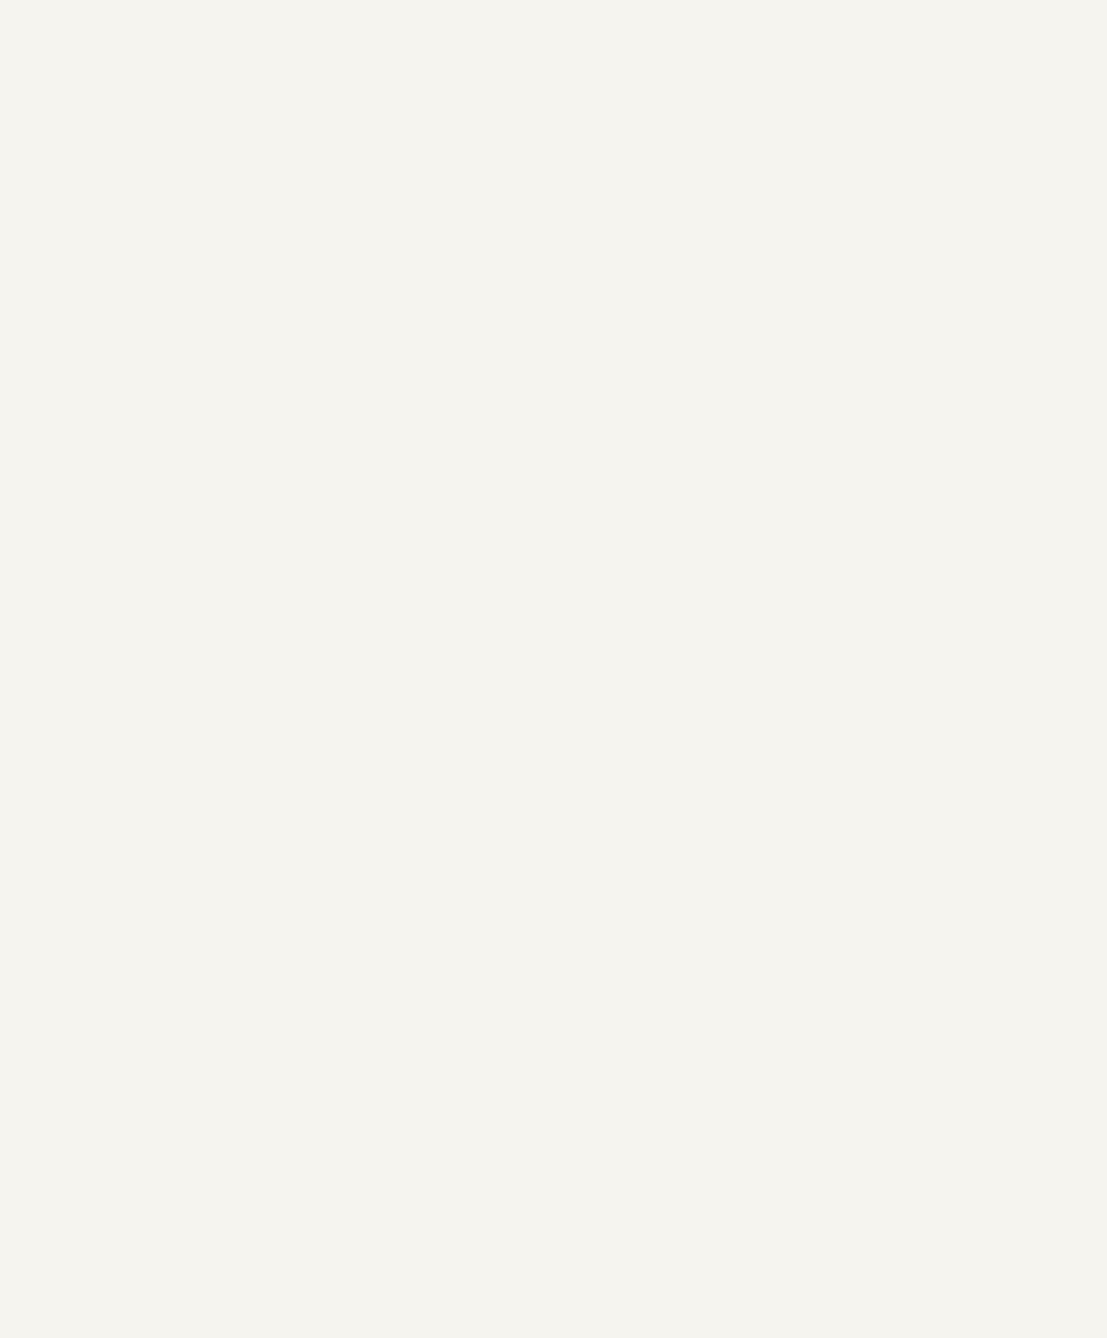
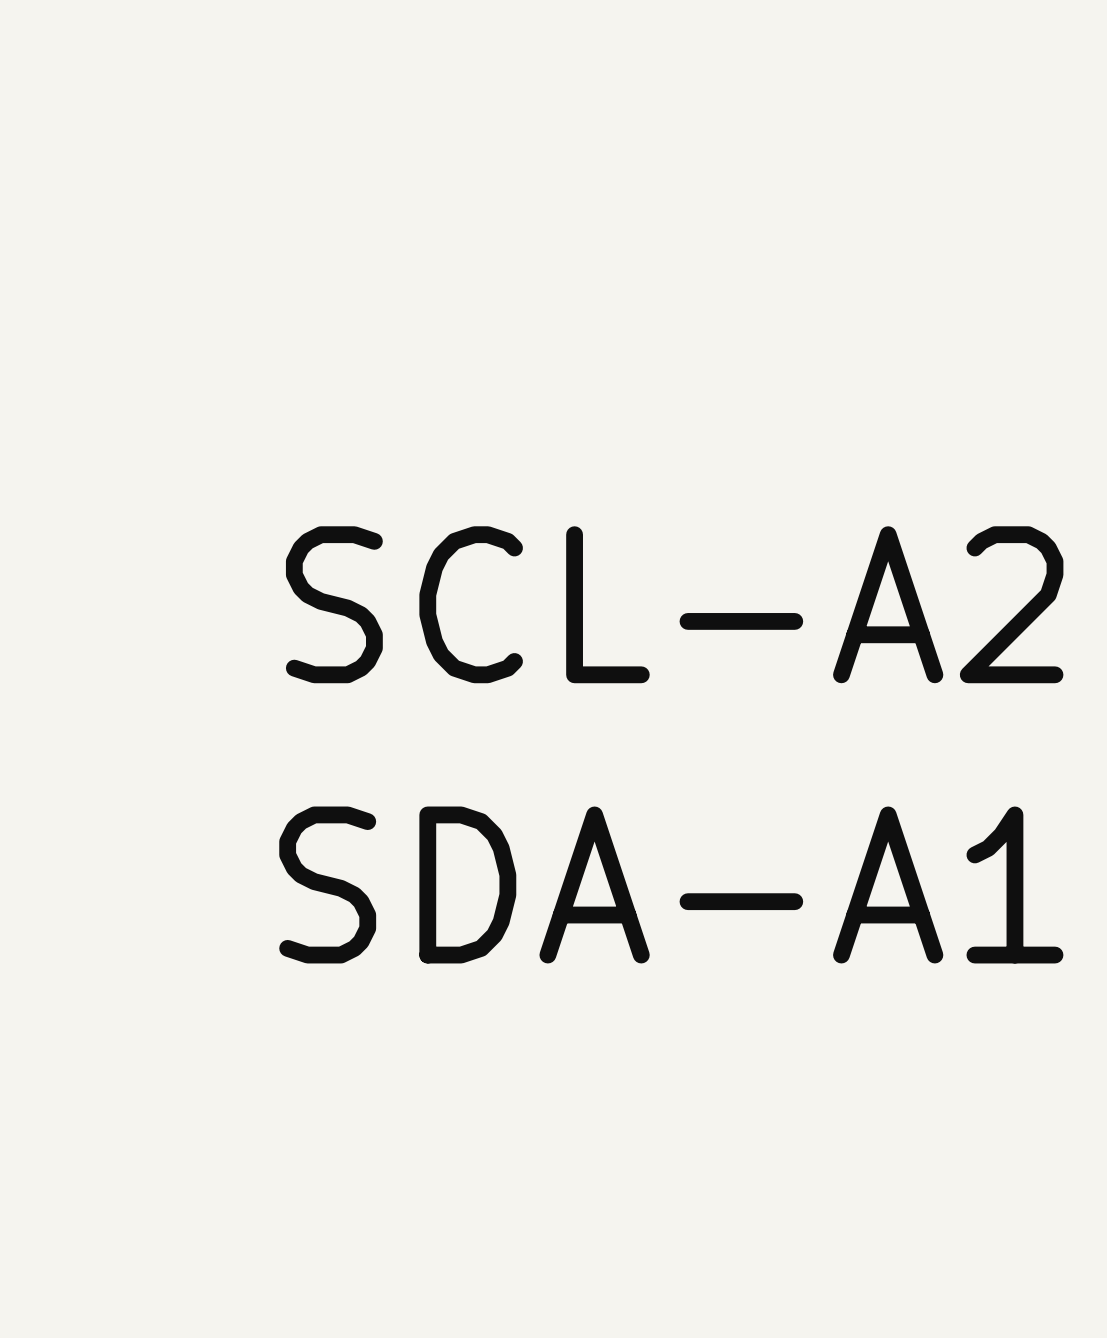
label: none -> SCL-A2 (674, 604)
label: none -> SDA-A1 (671, 884)

